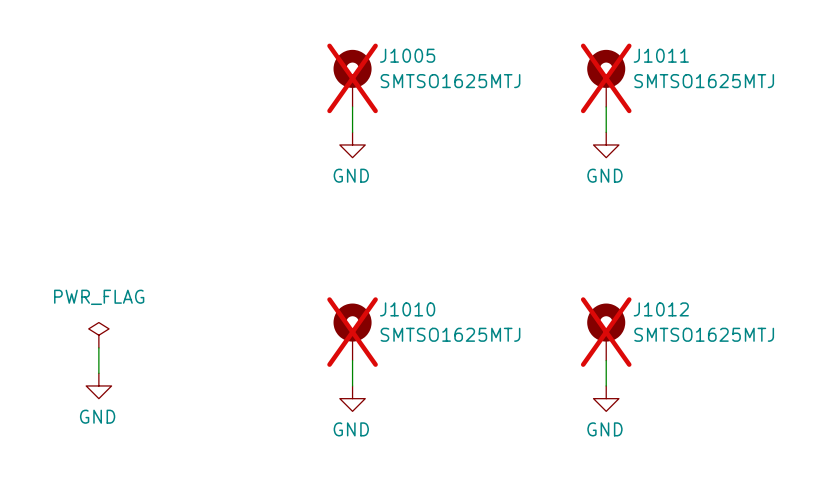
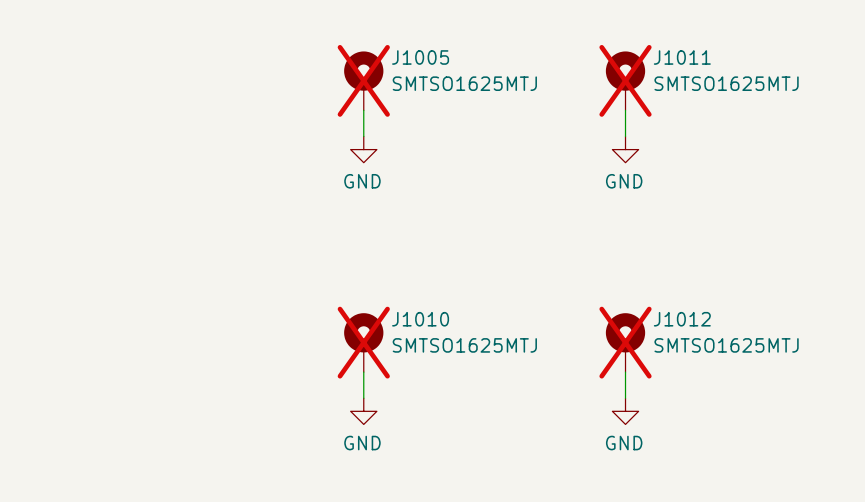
power symbol: PWR_FLAG (98, 335) -> none
wire: (98, 347) (98, 373) -> none
power symbol: GND (98, 385) -> none

